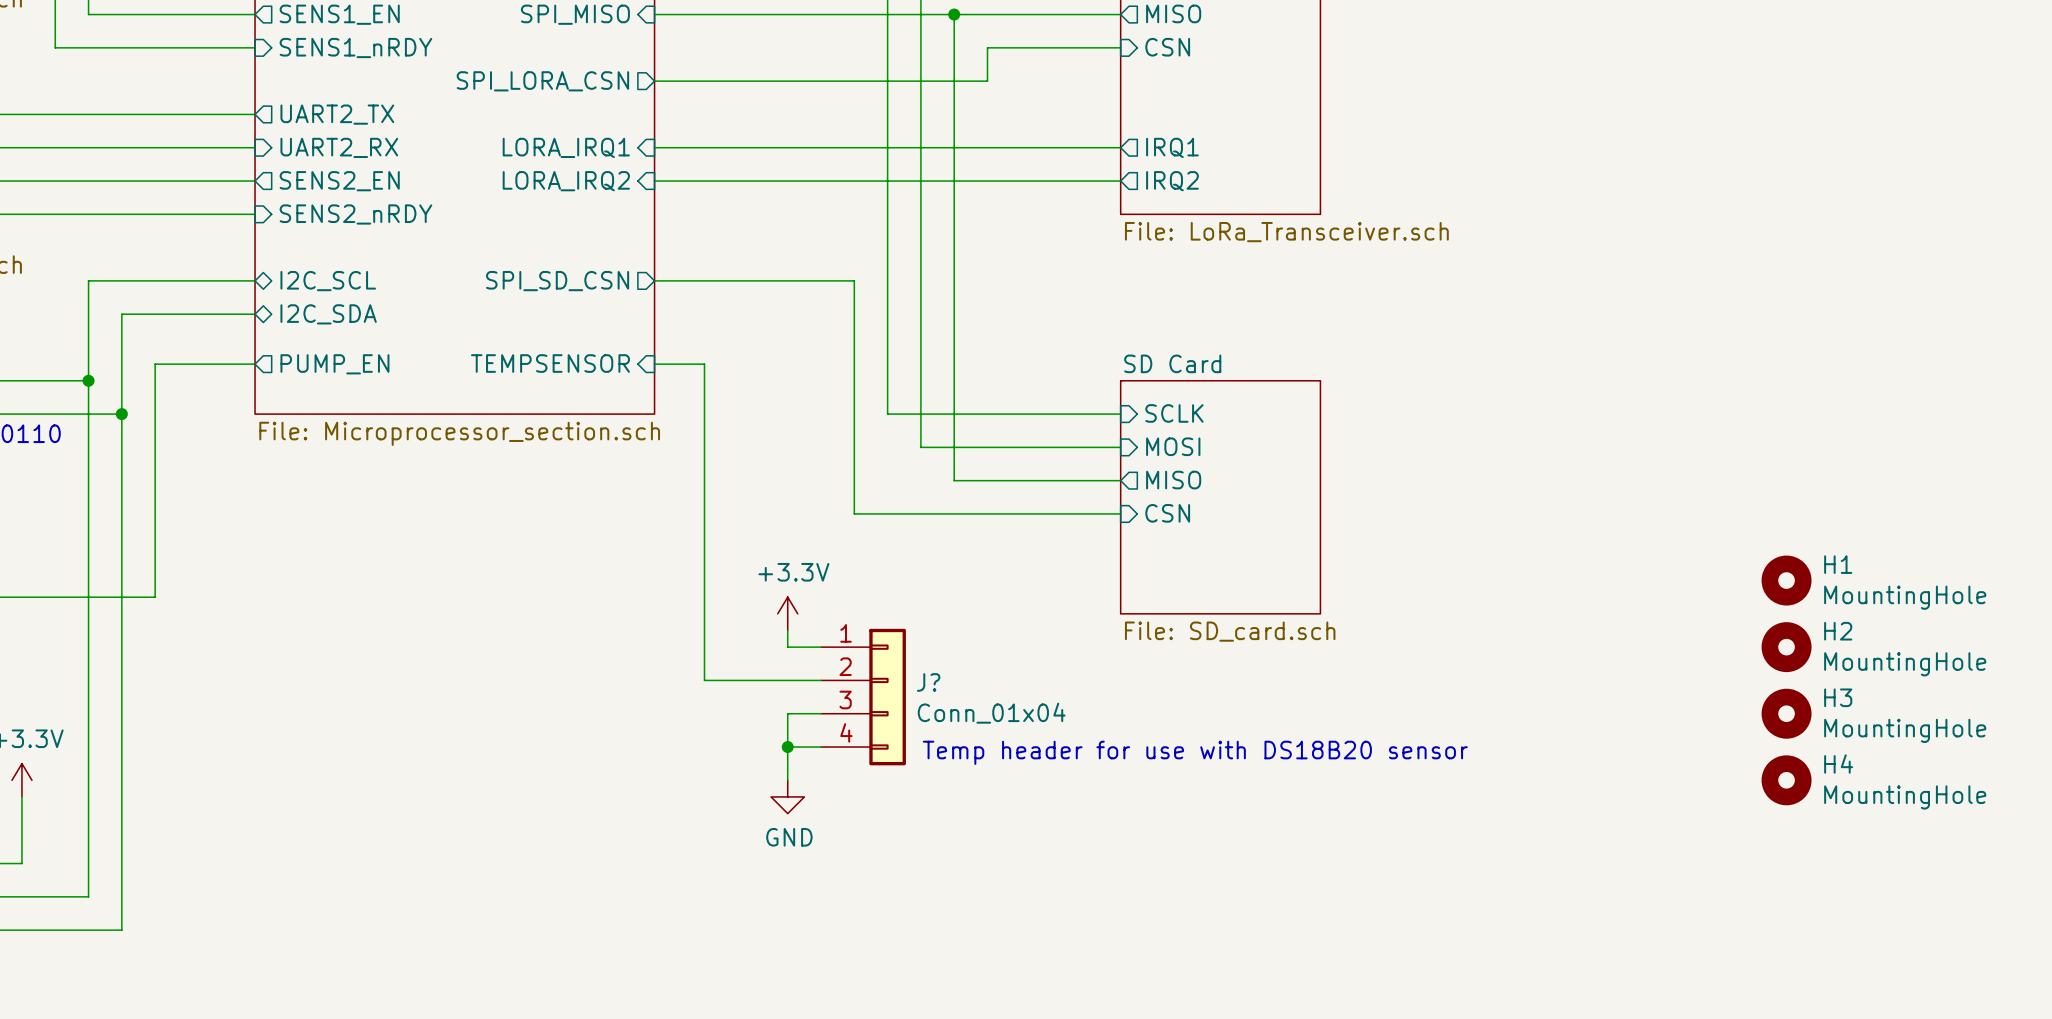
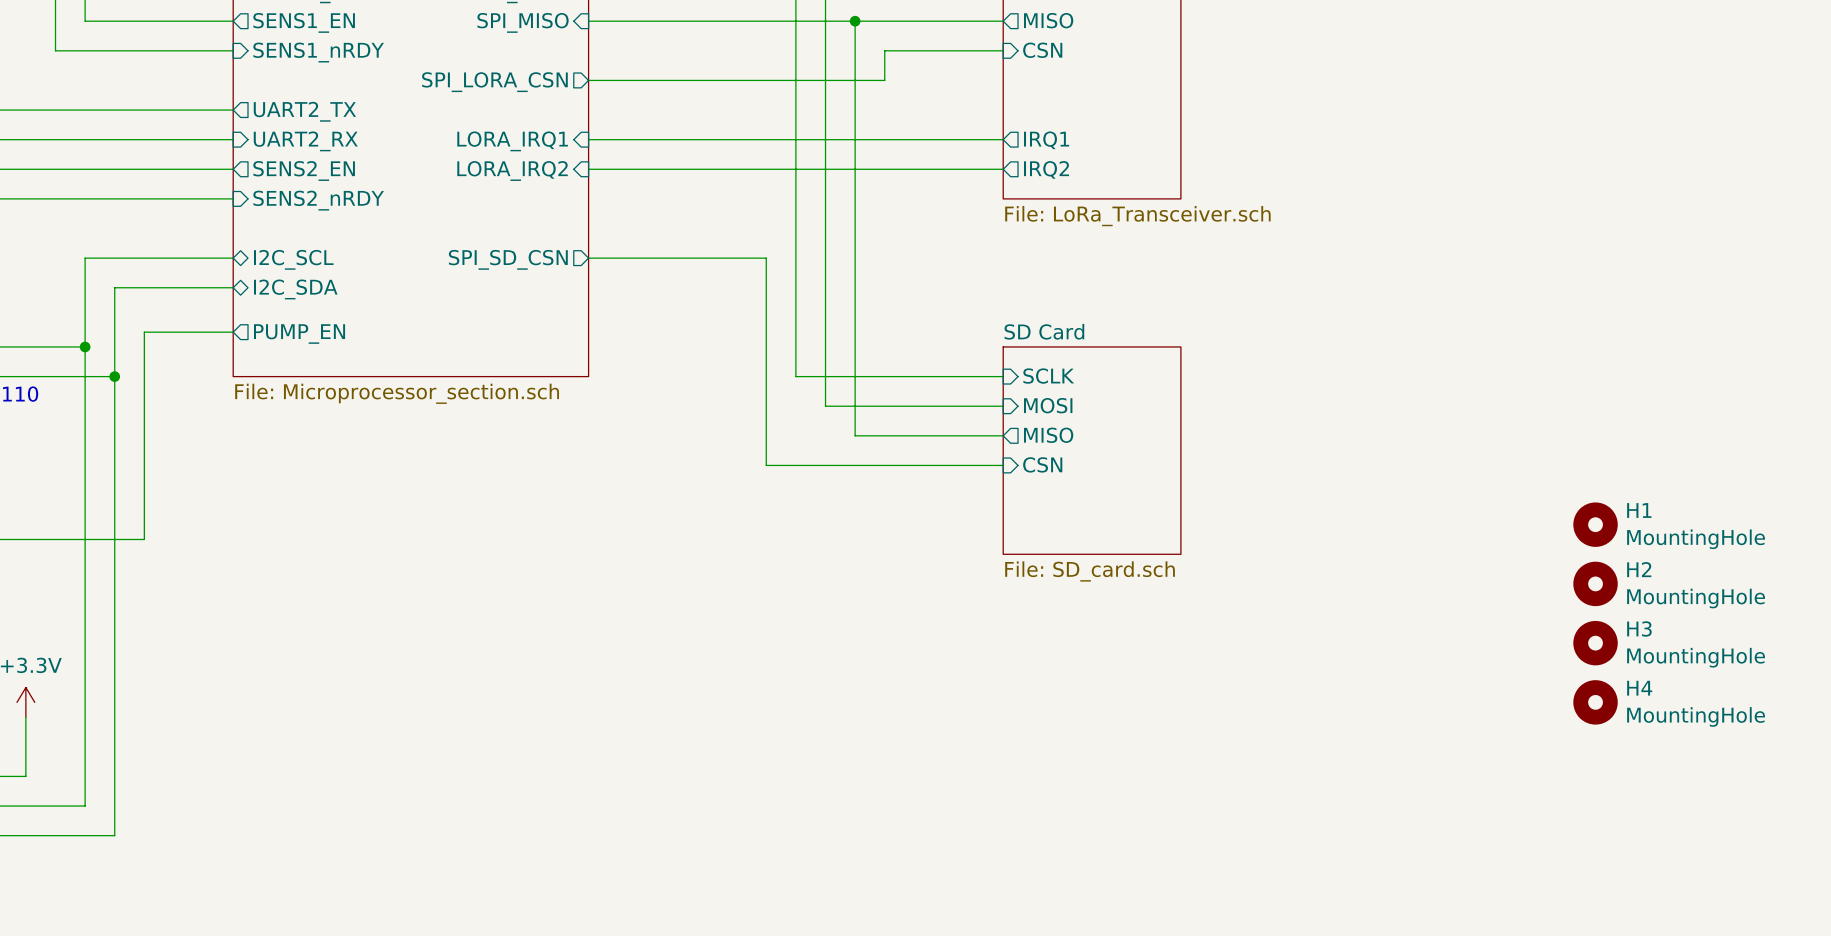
sheet pin: TEMPSENSOR (550, 363) -> none
wire: (654, 364) (704, 364) (704, 680) (821, 680) -> none
power symbol: +3.3V (787, 613) -> none
wire: (787, 630) (787, 647) (821, 647) -> none
J?: Conn_01x04 (863, 697) -> none
wire: (821, 713) (787, 713) (787, 780) -> none
wire: (787, 747) (821, 747) -> none
junction: (787, 747) -> none
text: Temp header for use with DS18B20 sensor (1195, 752) -> none
power symbol: GND (787, 796) -> none

